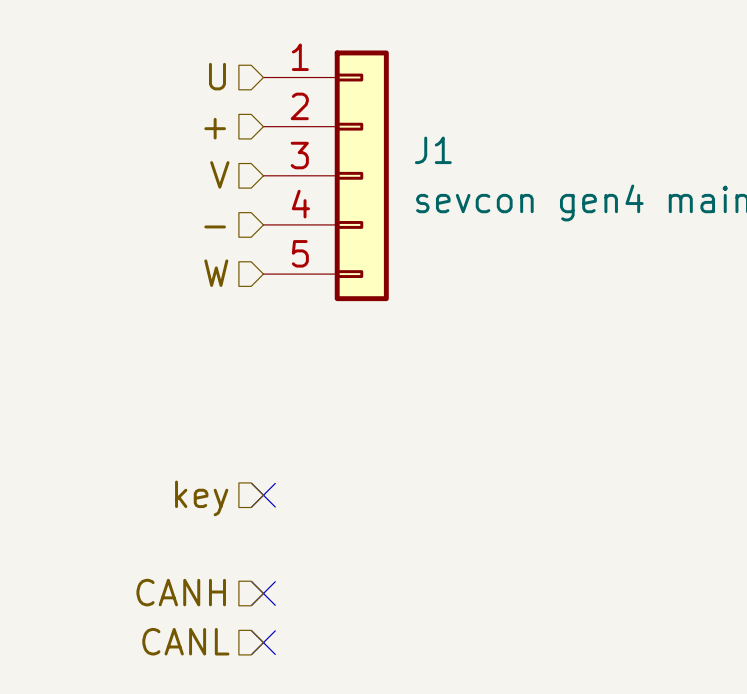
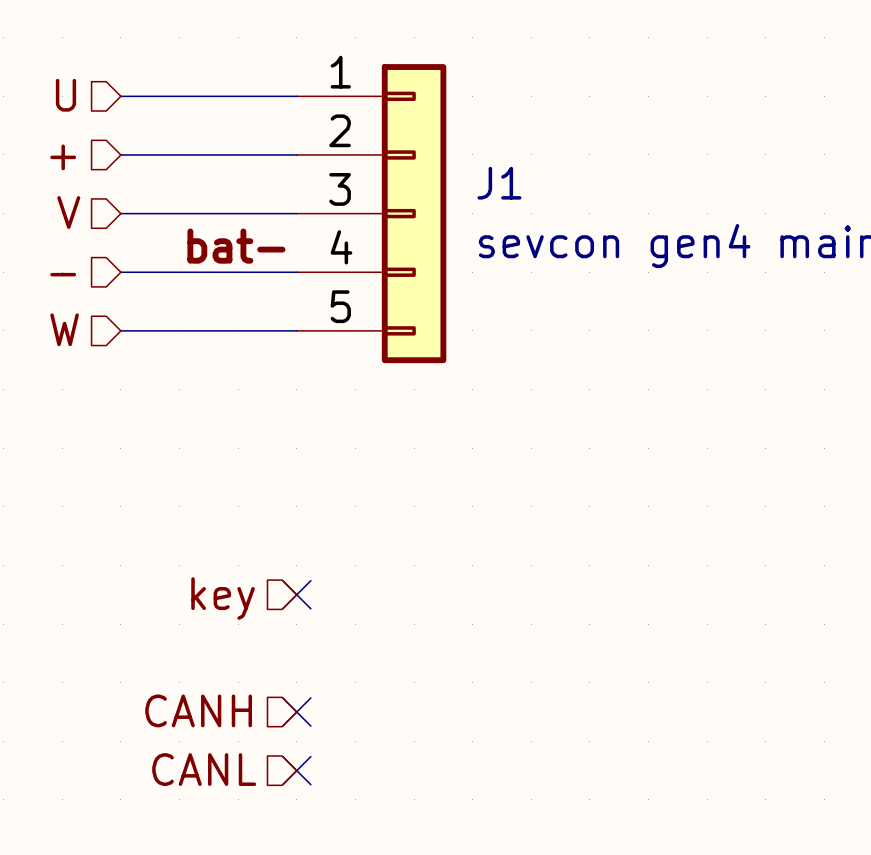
hierarchical label position: U (217, 76) -> U (65, 95)
wire: none -> (120, 96) (296, 96)
wire: none -> (120, 154) (296, 154)
hierarchical label position: + (215, 128) -> + (63, 157)
hierarchical label position: V (219, 174) -> V (68, 212)
wire: none -> (120, 213) (296, 213)
label: none -> bat- (236, 246)
wire: none -> (120, 272) (296, 272)
hierarchical label position: - (215, 226) -> - (63, 274)
hierarchical label position: W (216, 273) -> W (64, 329)
wire: none -> (120, 330) (296, 330)

